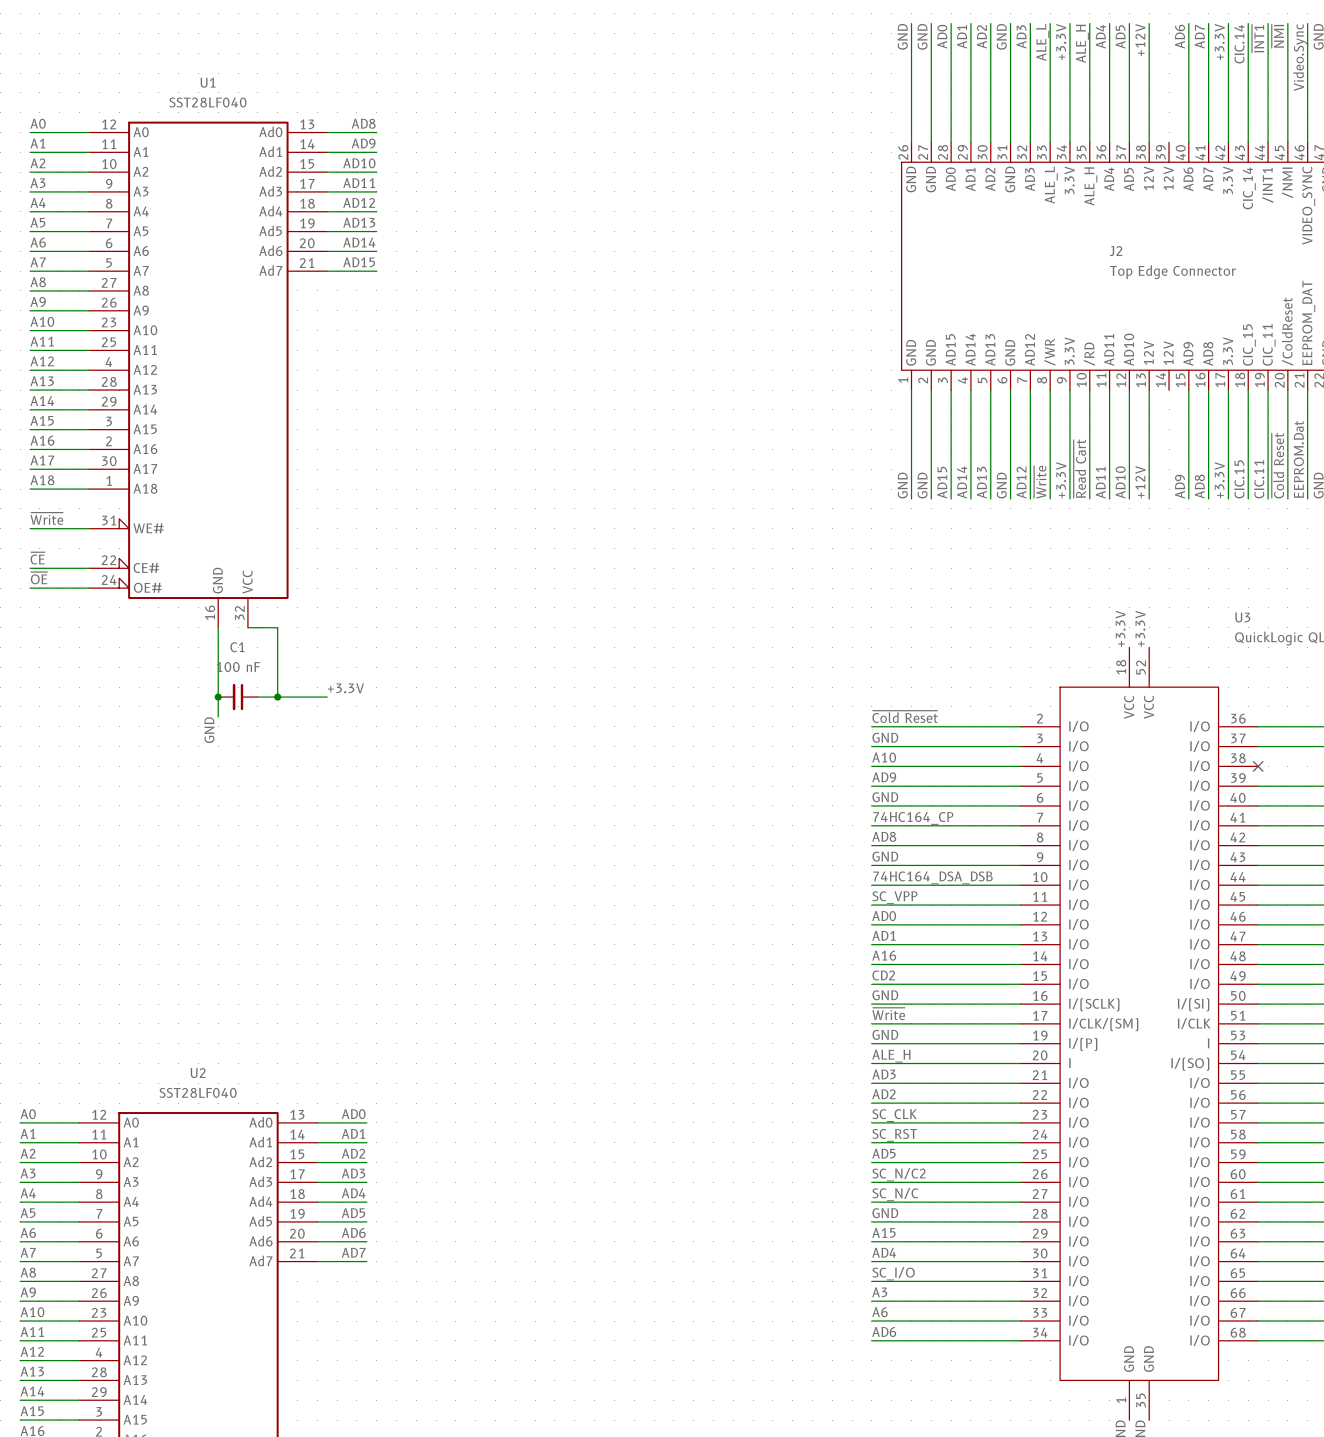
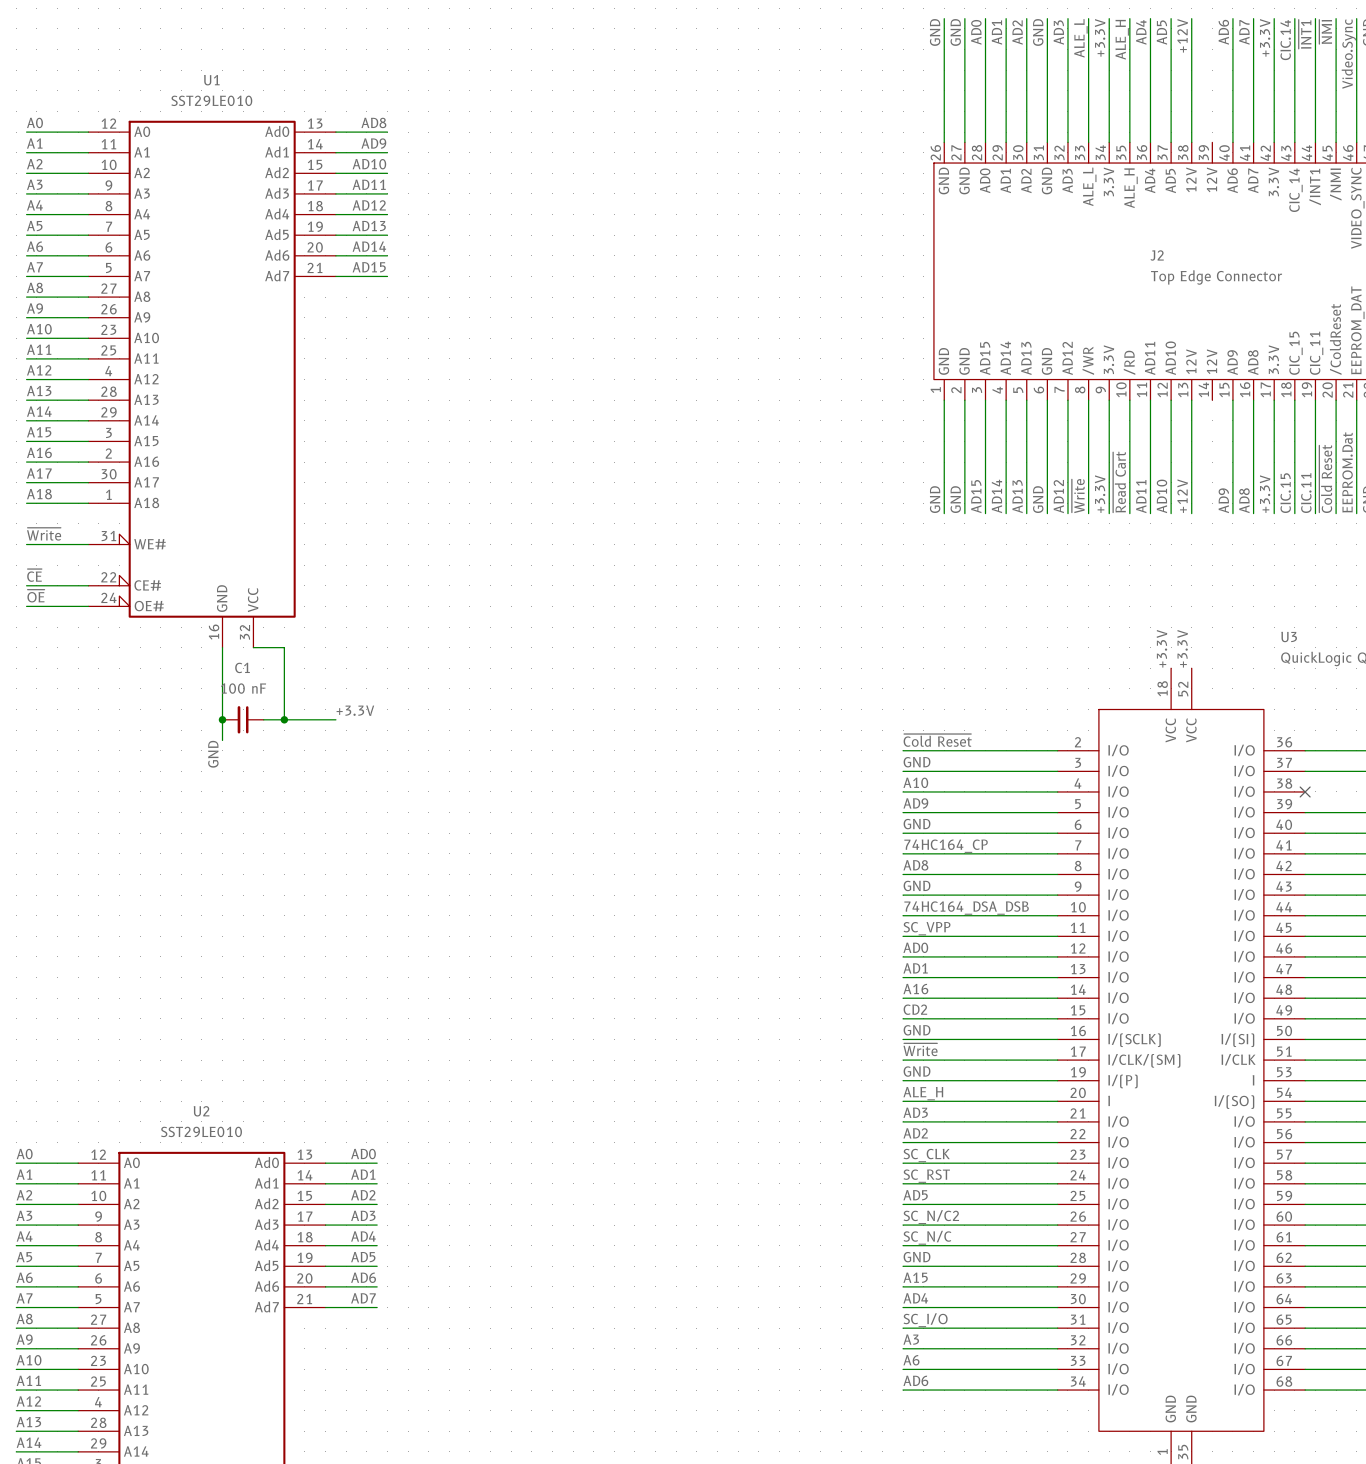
U1 value: SST28LF040 (207, 102) -> SST29LE010 (211, 100)
U2 value: SST28LF040 (198, 1092) -> SST29LE010 (201, 1131)

